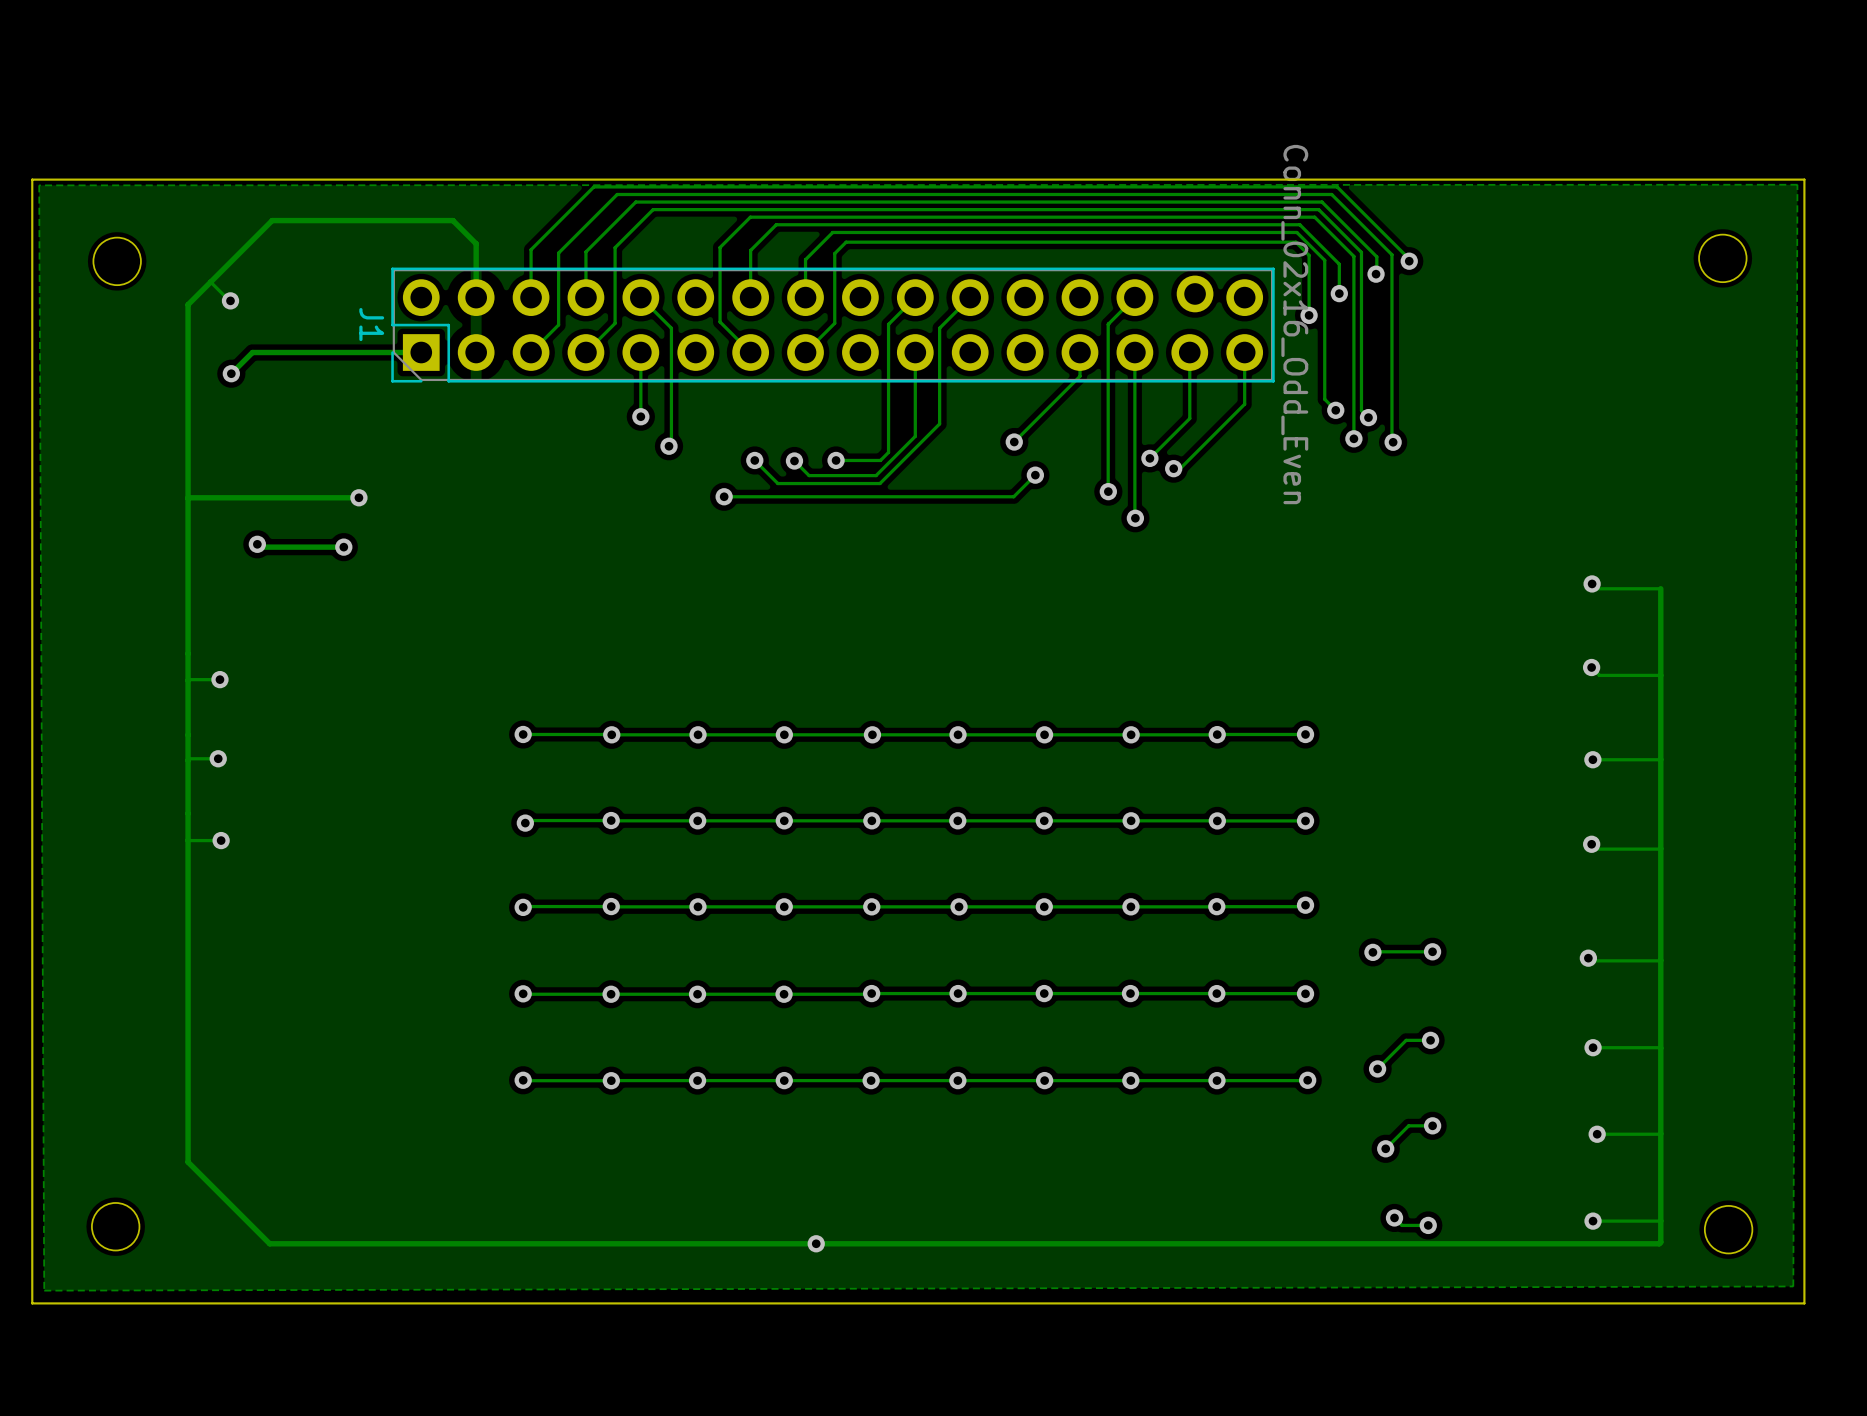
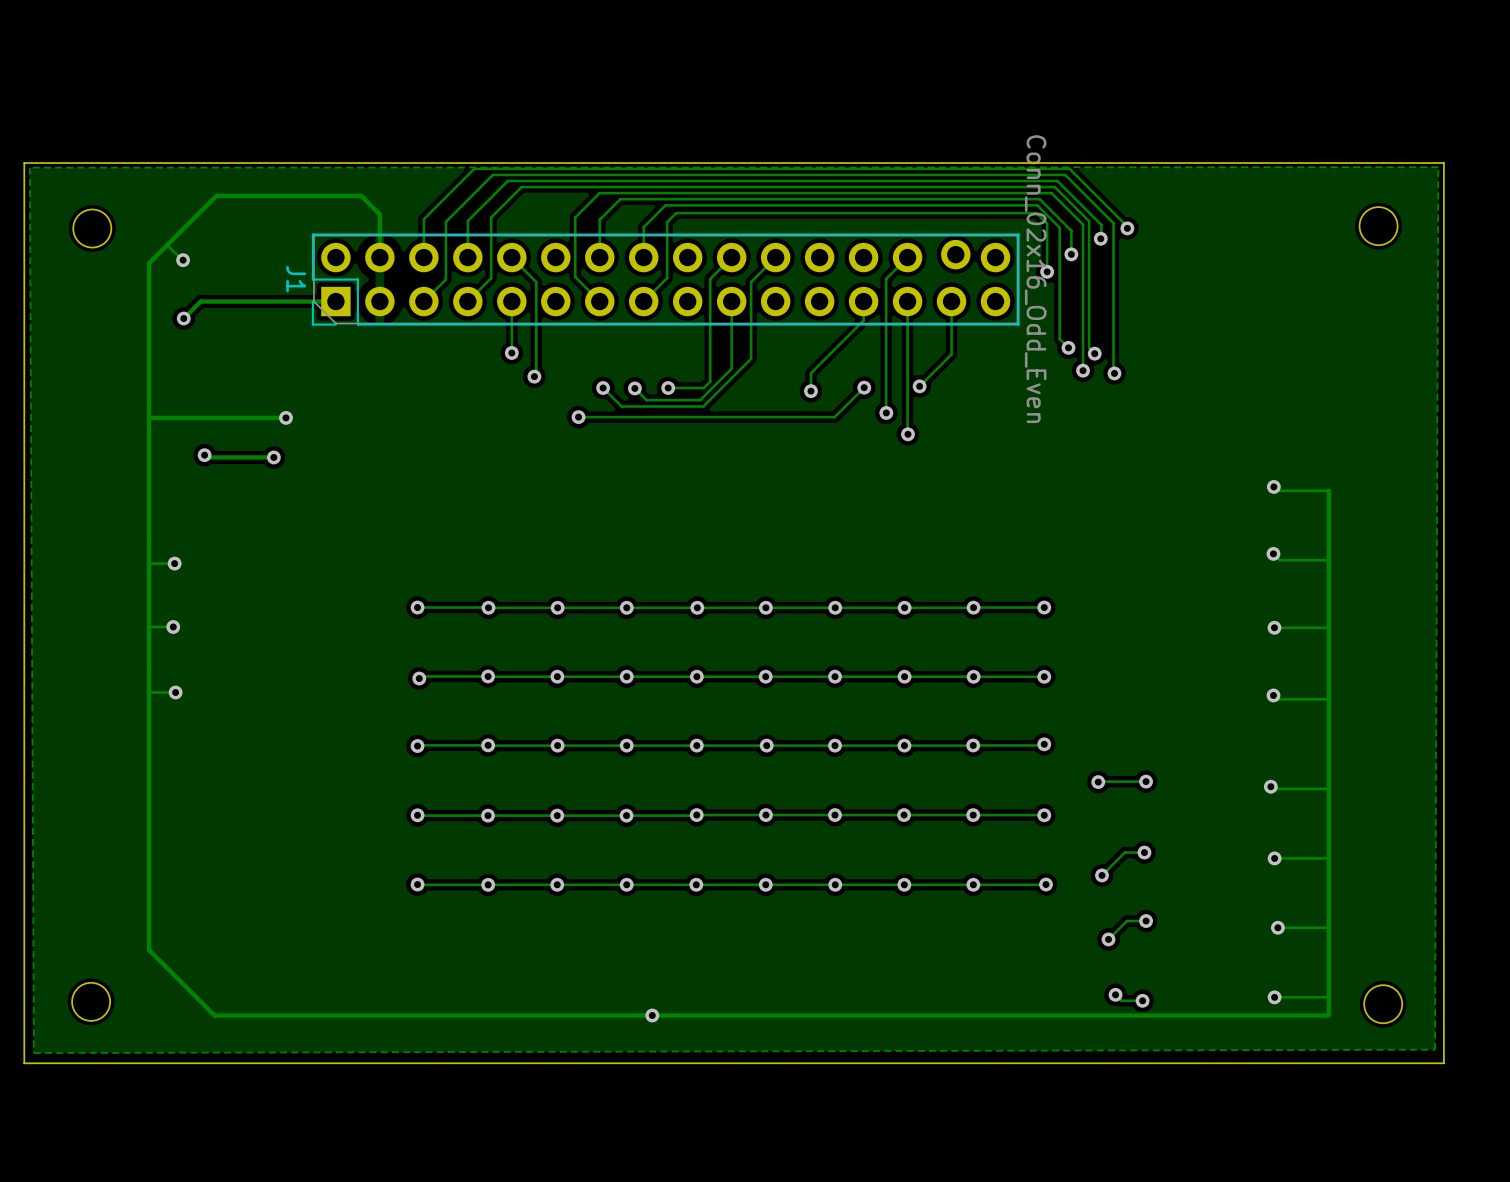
track: (1244, 352) (1244, 404) (1180, 468) (1173, 468) -> none
track: none -> (810, 373) (810, 391)
via: (1014, 442) -> none
via: none -> (864, 387)
via: none -> (810, 391)
via: (1173, 468) -> none
track: (1035, 475) (1013, 496) -> (864, 387) (834, 417) (810, 417)
via: (1035, 475) -> none

